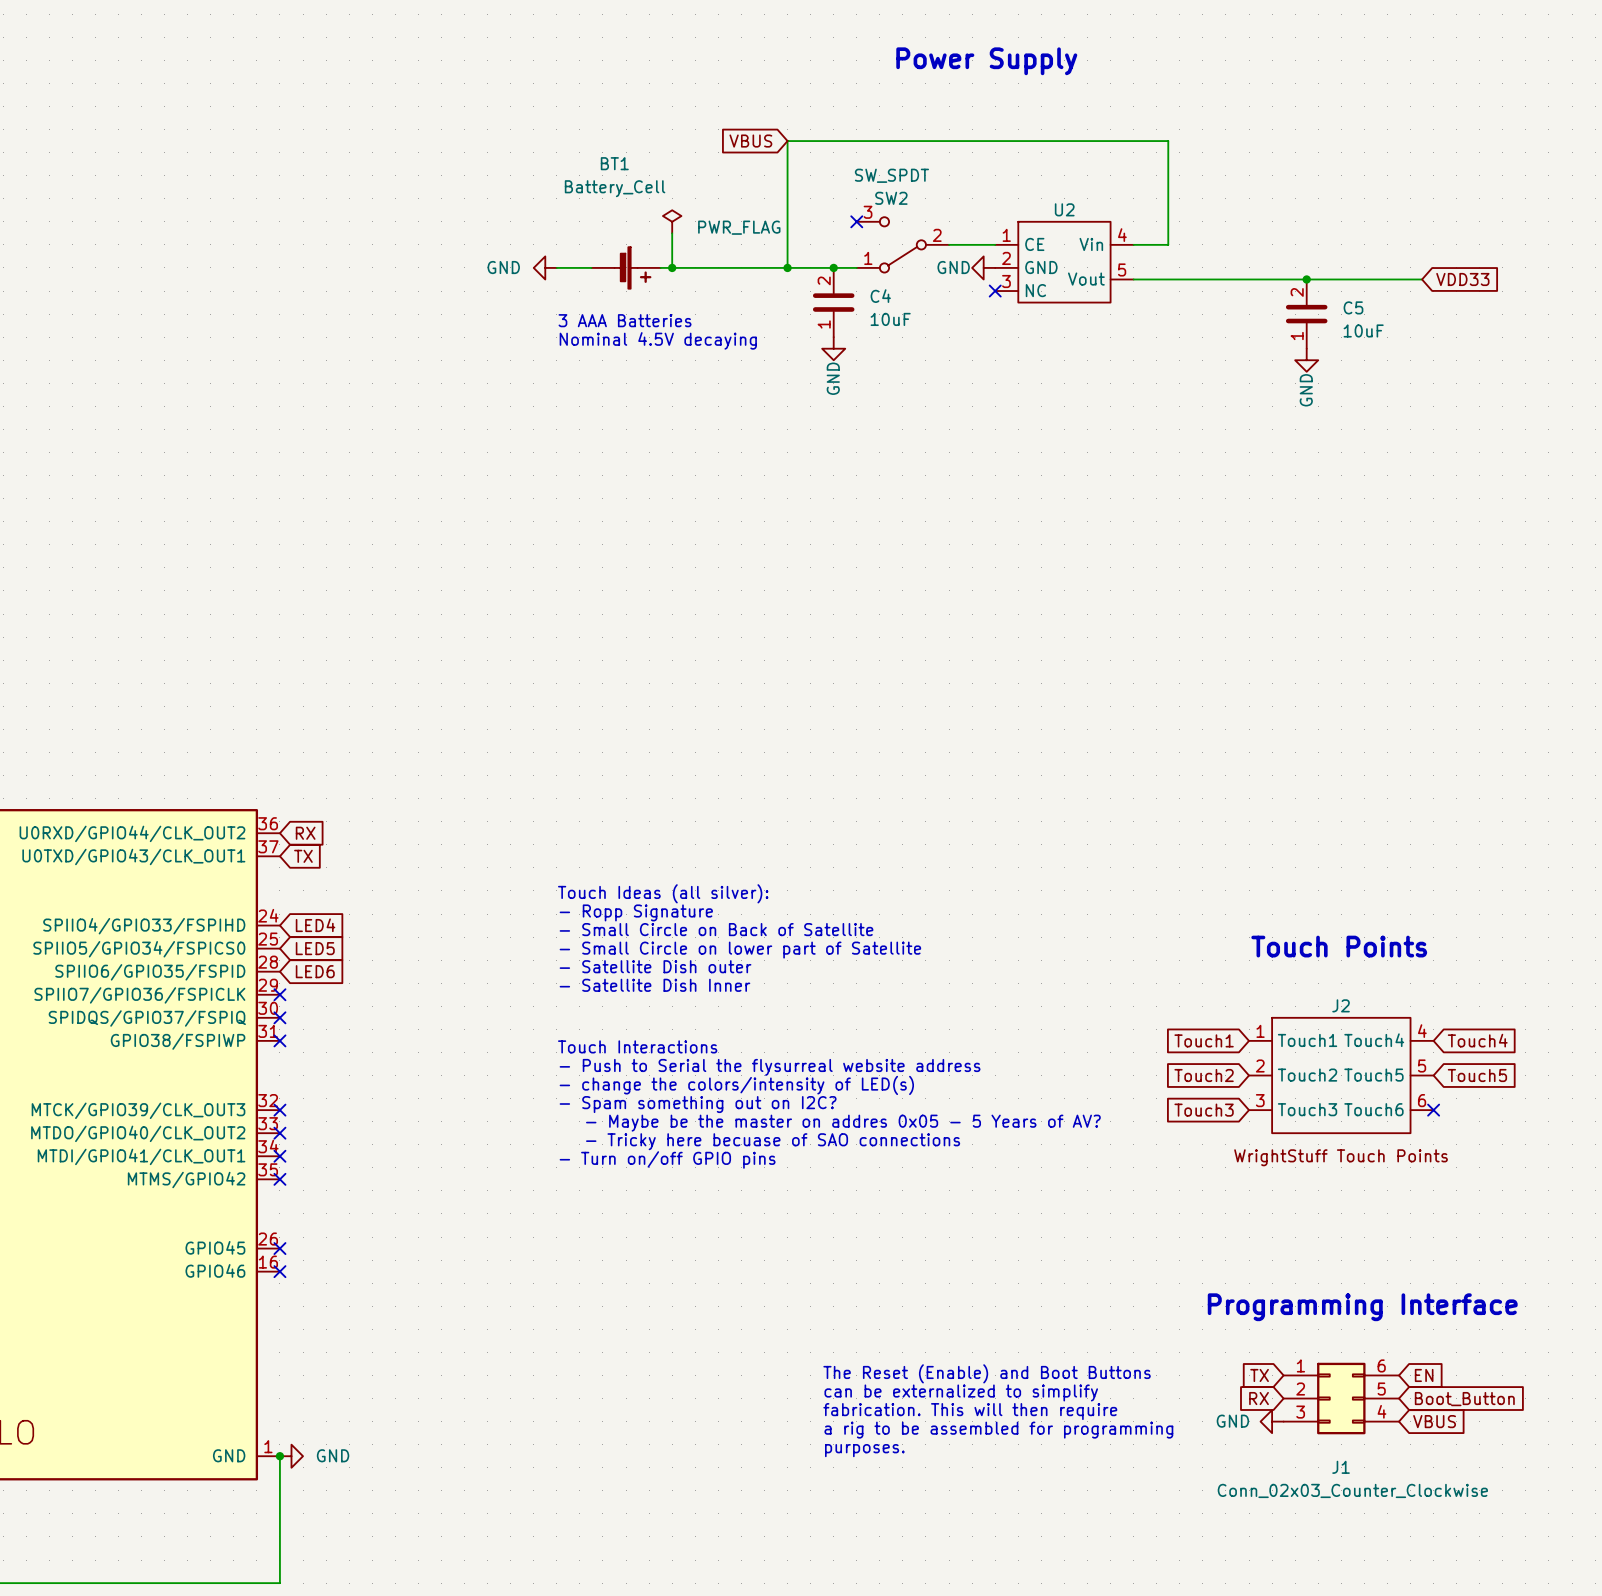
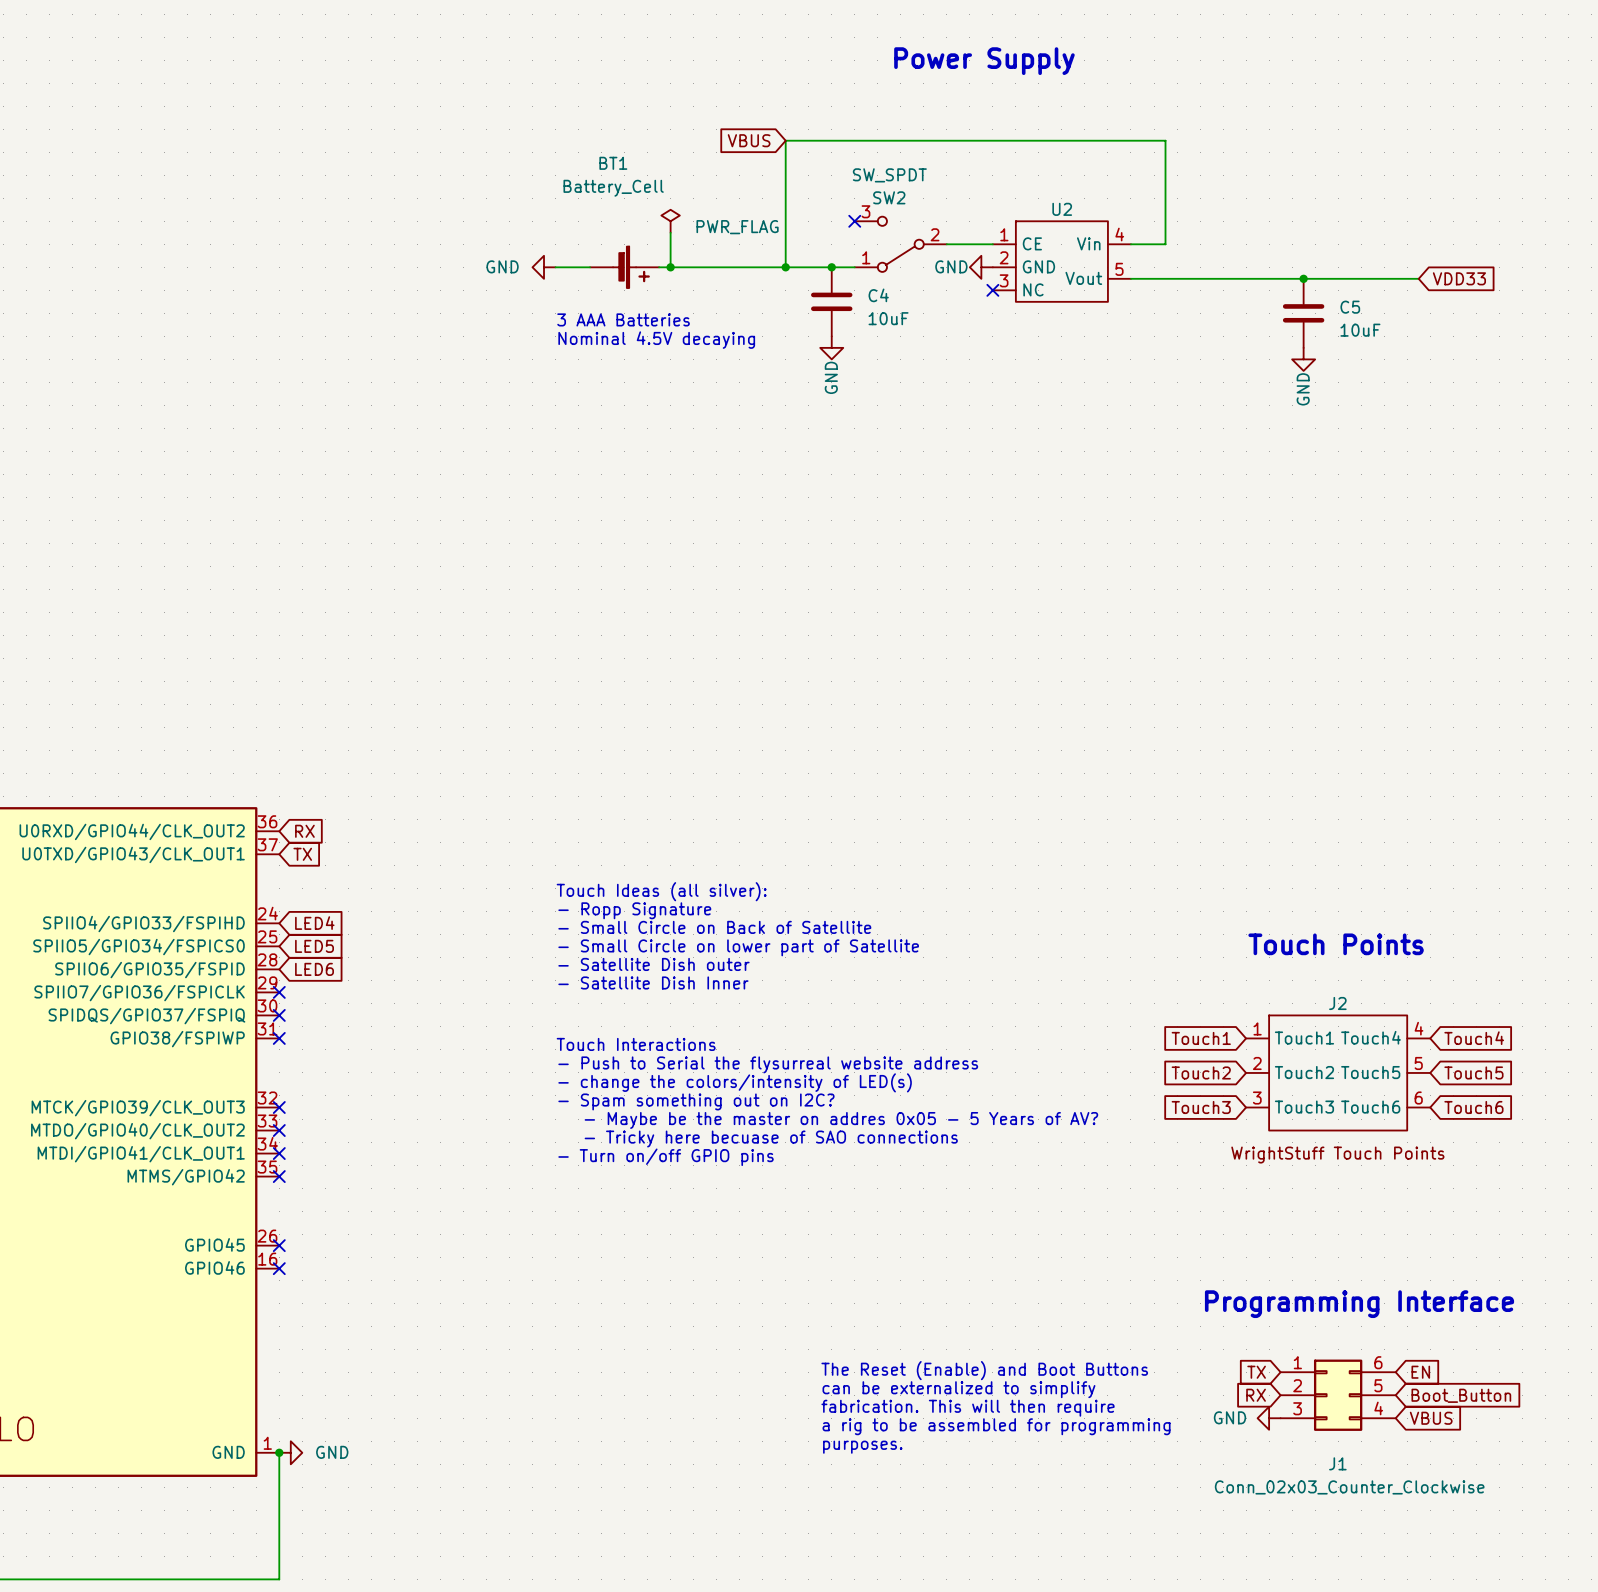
C4 pin number: 2 (824, 280) -> none
C5 pin number: 2 (1297, 292) -> none
C4 pin number: 1 (824, 324) -> none
C5 pin number: 1 (1297, 336) -> none
no-connect mark: (1433, 1110) -> none
global label: none -> Touch6 (1473, 1107)

